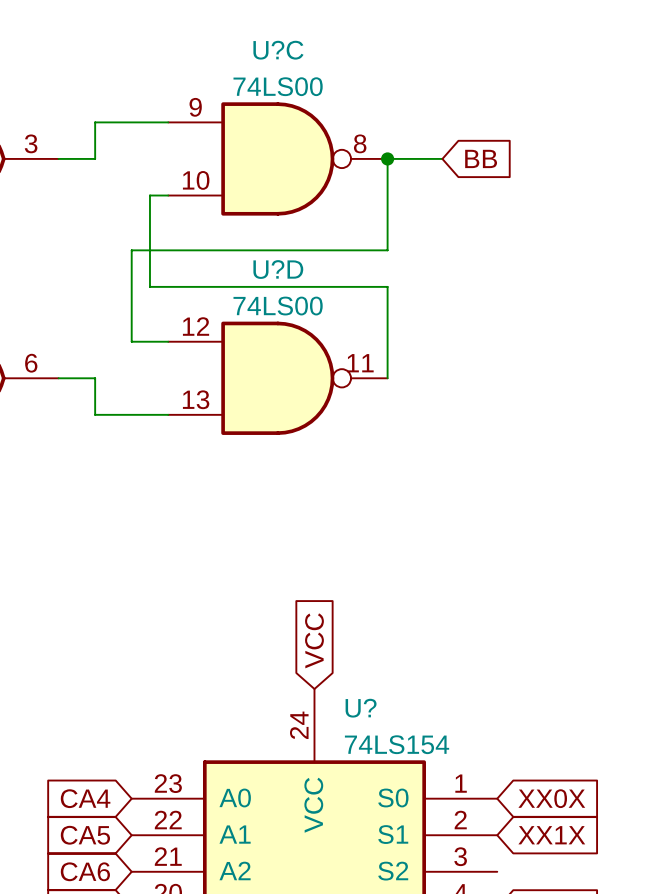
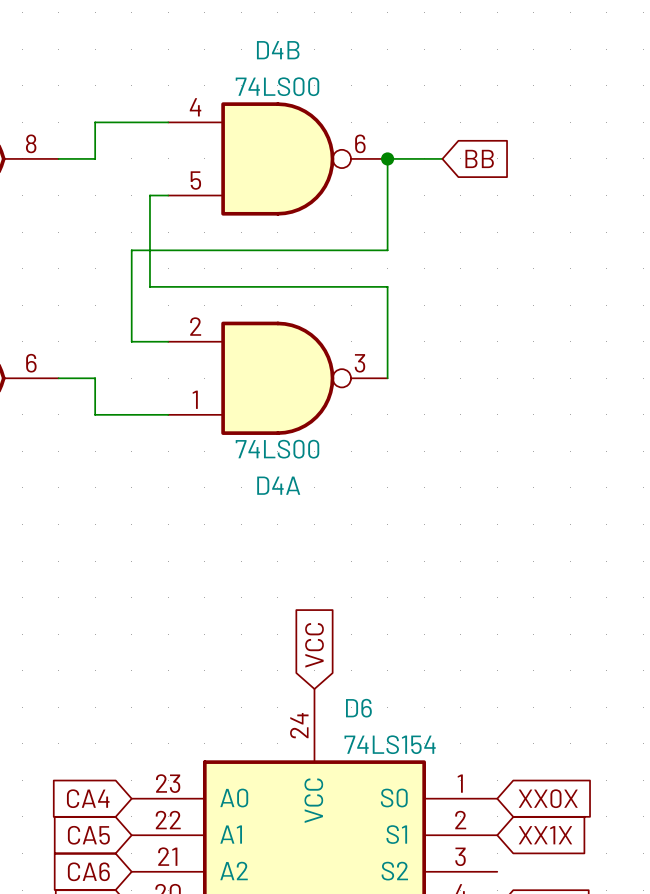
U?C name: U?C (278, 50) -> D4B (278, 50)
U?C pin number: 9 (195, 107) -> 4 (195, 107)
part pin number: 3 (31, 143) -> 8 (31, 143)
U?C pin number: 8 (360, 143) -> 6 (360, 143)
U?C pin number: 10 (196, 180) -> 5 (195, 180)
U?D name: U?D (278, 269) -> D4A (278, 485)
U?D value position: 74LS00 (278, 306) -> 74LS00 (277, 449)
U?D pin number: 12 (196, 326) -> 2 (195, 326)
U?D pin number: 11 (360, 363) -> 3 (359, 363)
U?D pin number: 13 (196, 399) -> 1 (195, 399)
U? name: U? (361, 708) -> D6 (358, 708)

